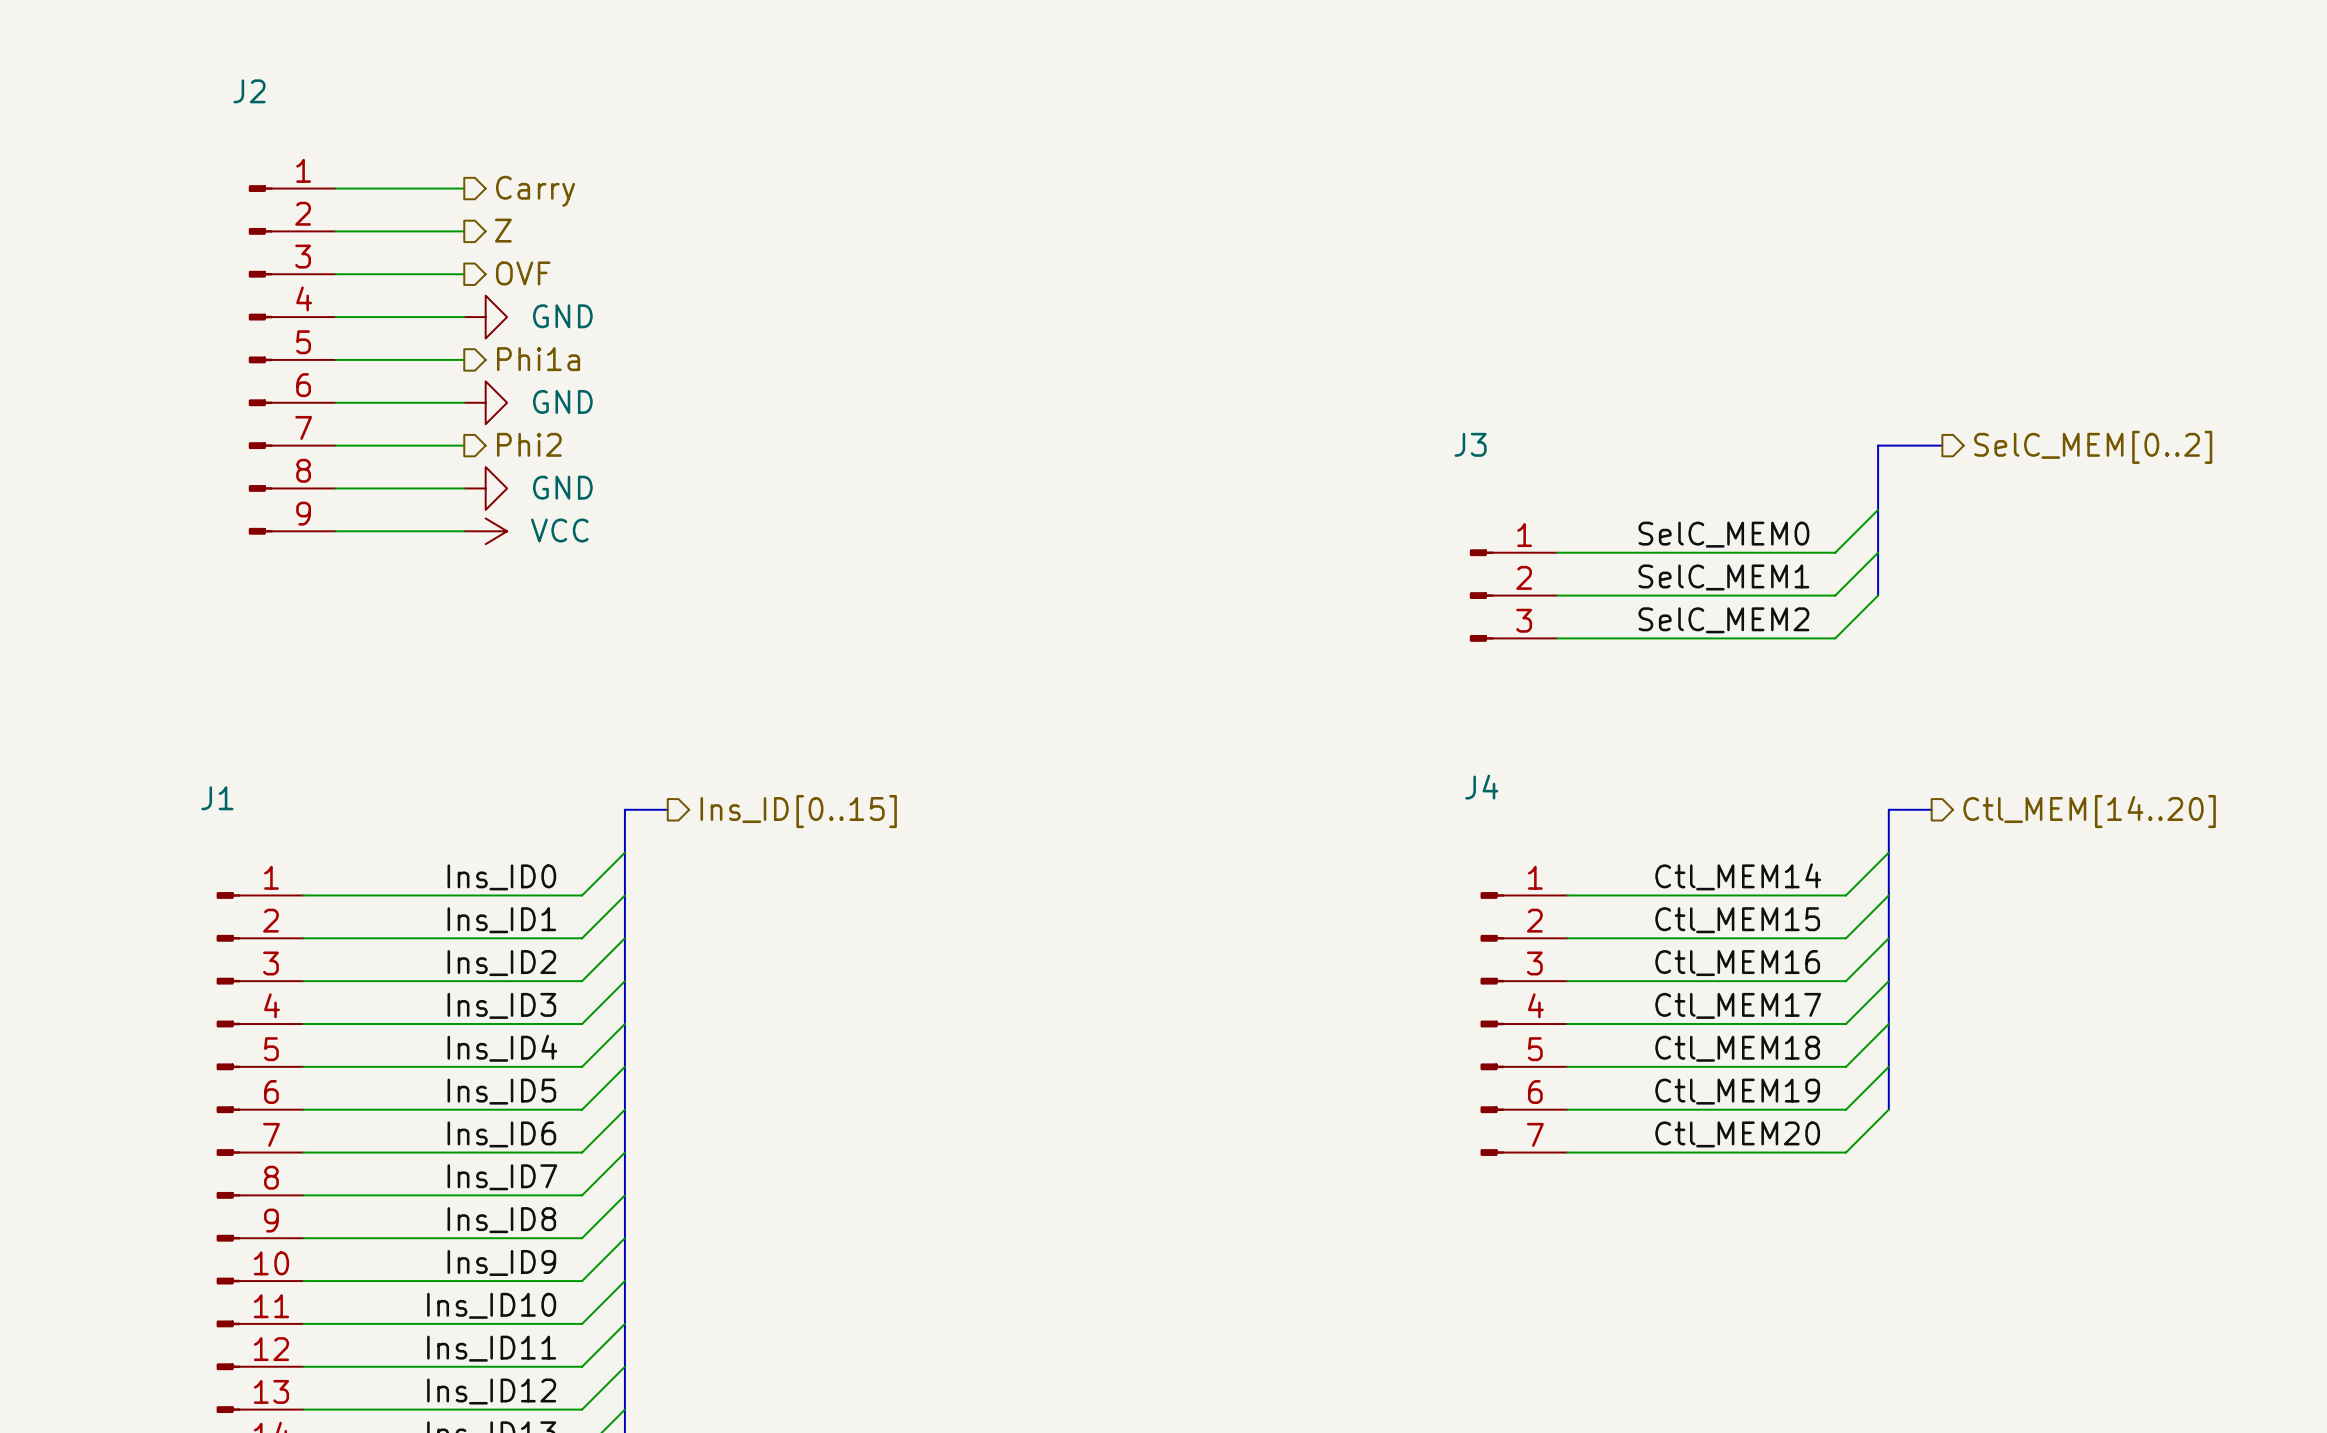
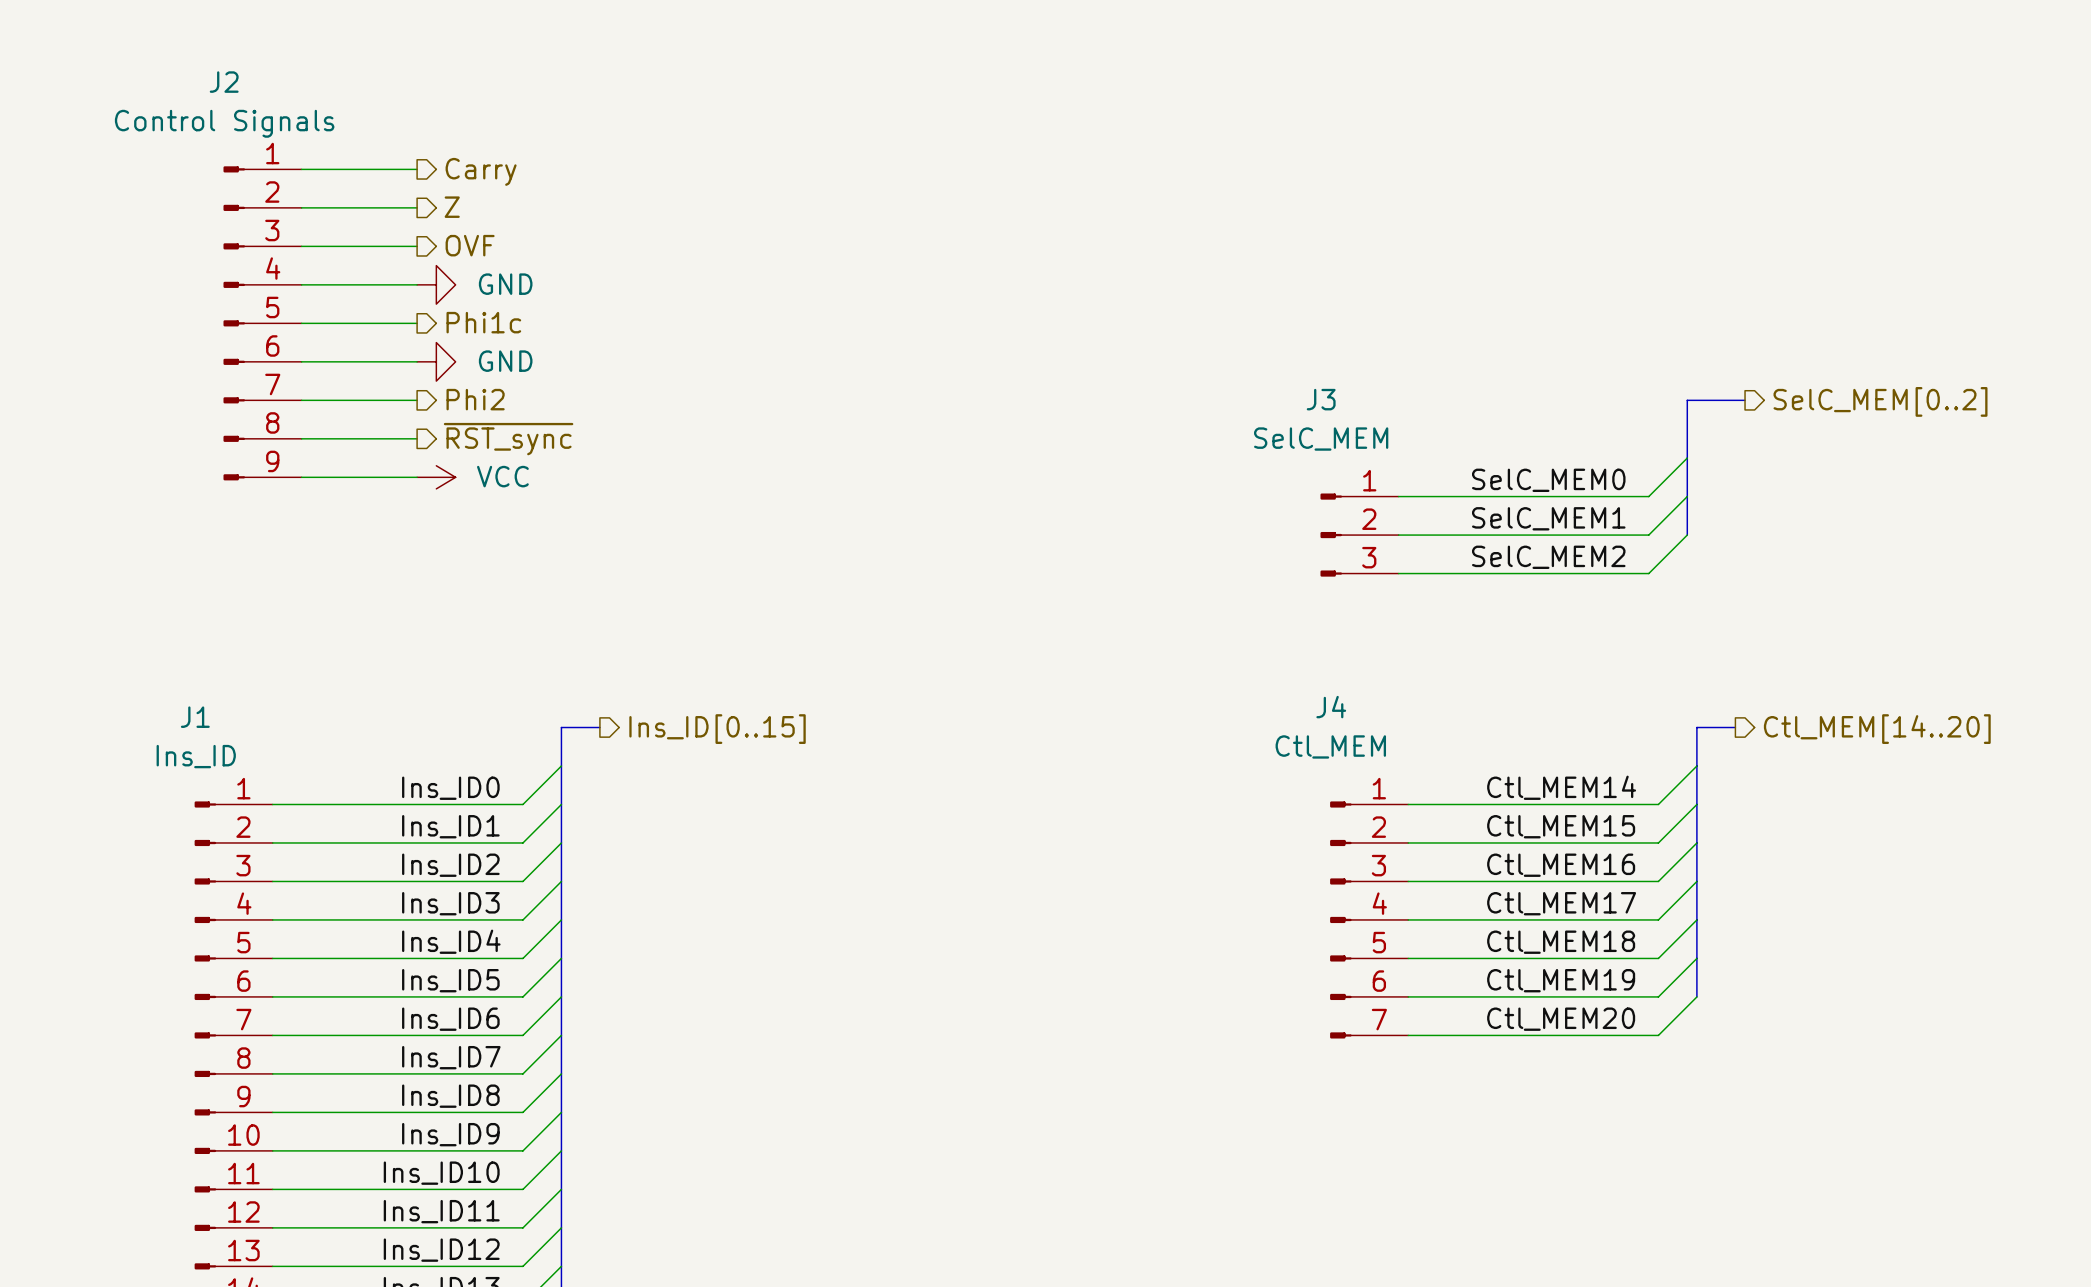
J2 value: none -> Control Signals (224, 123)
hierarchical label: Phi1a (538, 359) -> Phi1c (483, 322)
power symbol: GND (485, 488) -> none
hierarchical label: none -> ~{RST_sync} (508, 439)
J3 value: none -> SelC_MEM (1321, 439)
J4 value: none -> Ctl_MEM (1330, 746)
J1 value: none -> Ins_ID (196, 756)

